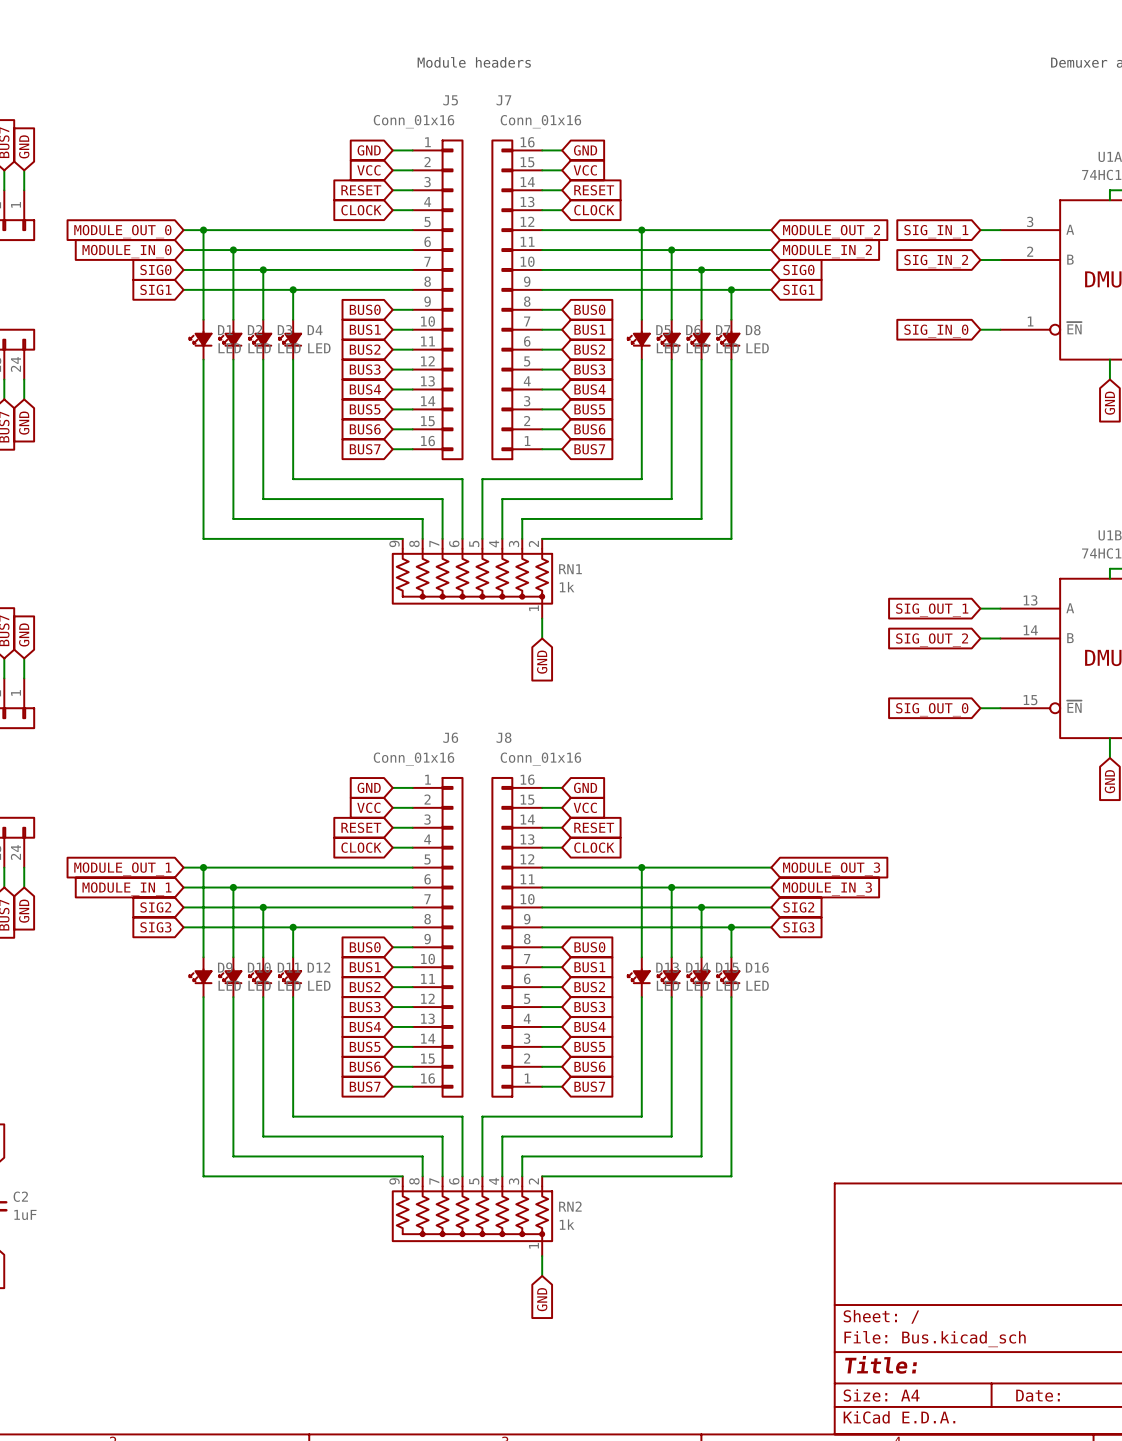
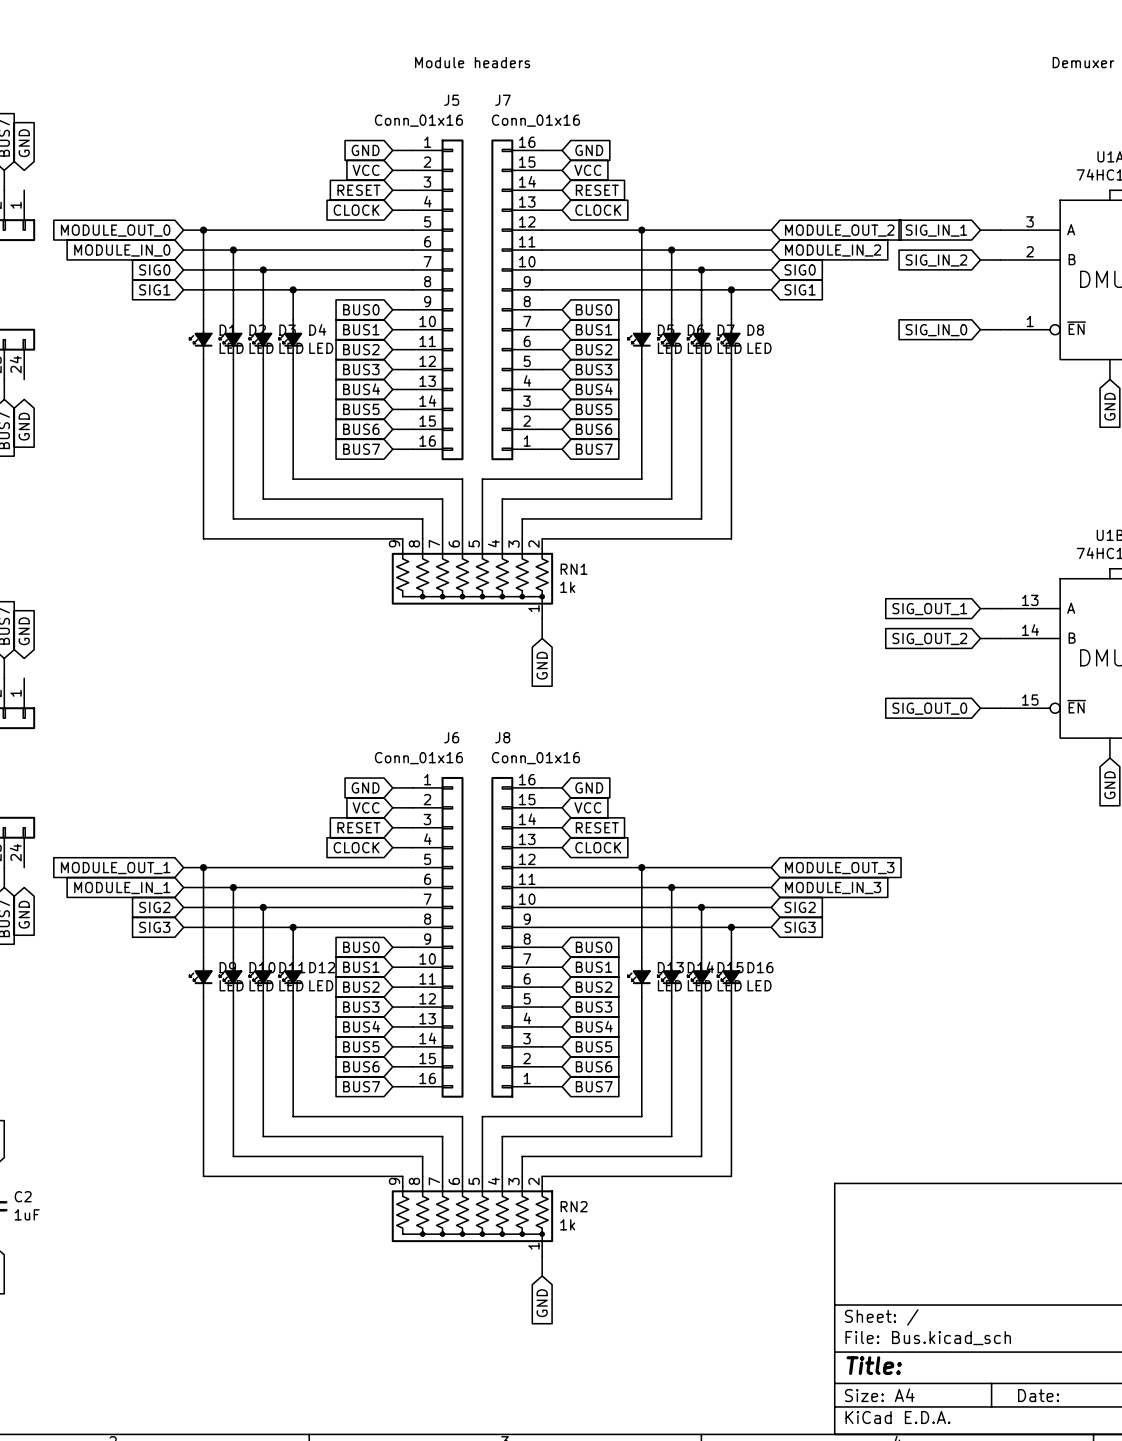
wire: (24, 170) (24, 190) -> none
wire: (24, 379) (24, 399) -> none
wire: (24, 658) (24, 678) -> none
wire: (24, 867) (24, 887) -> none

